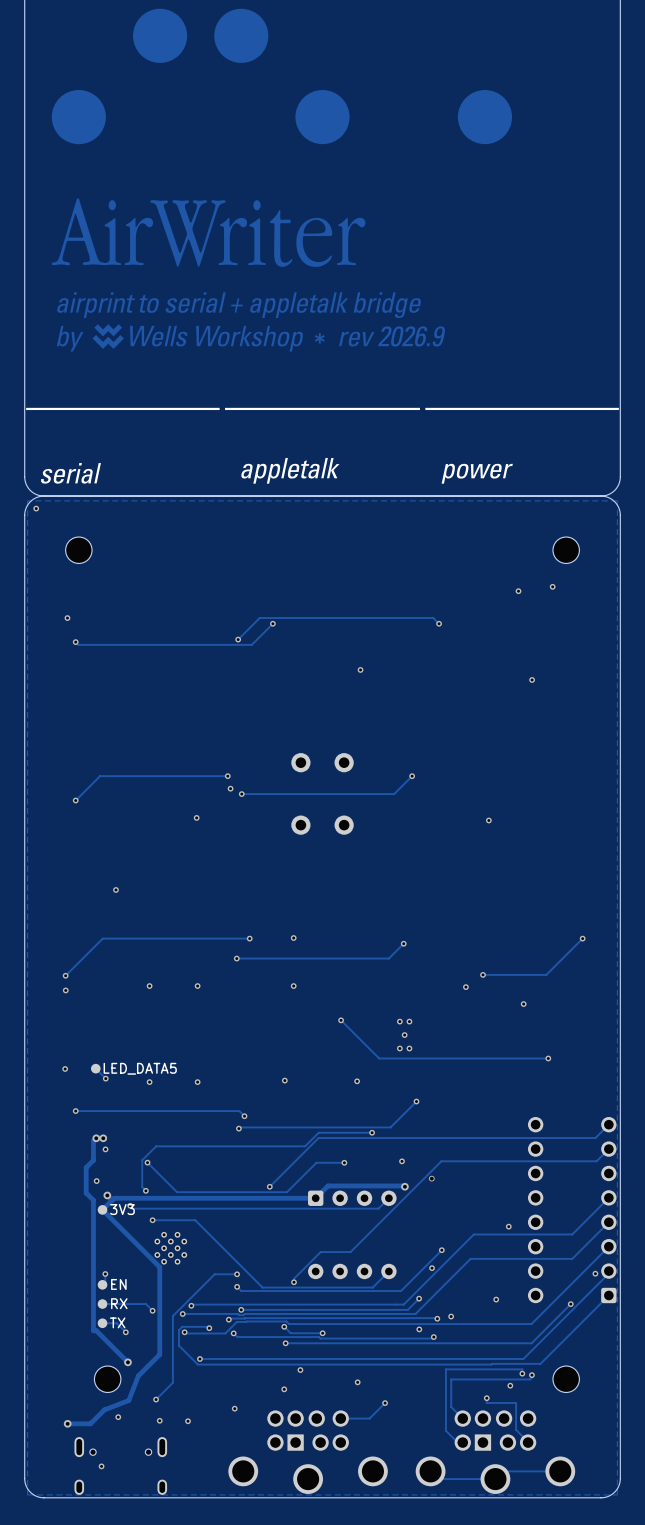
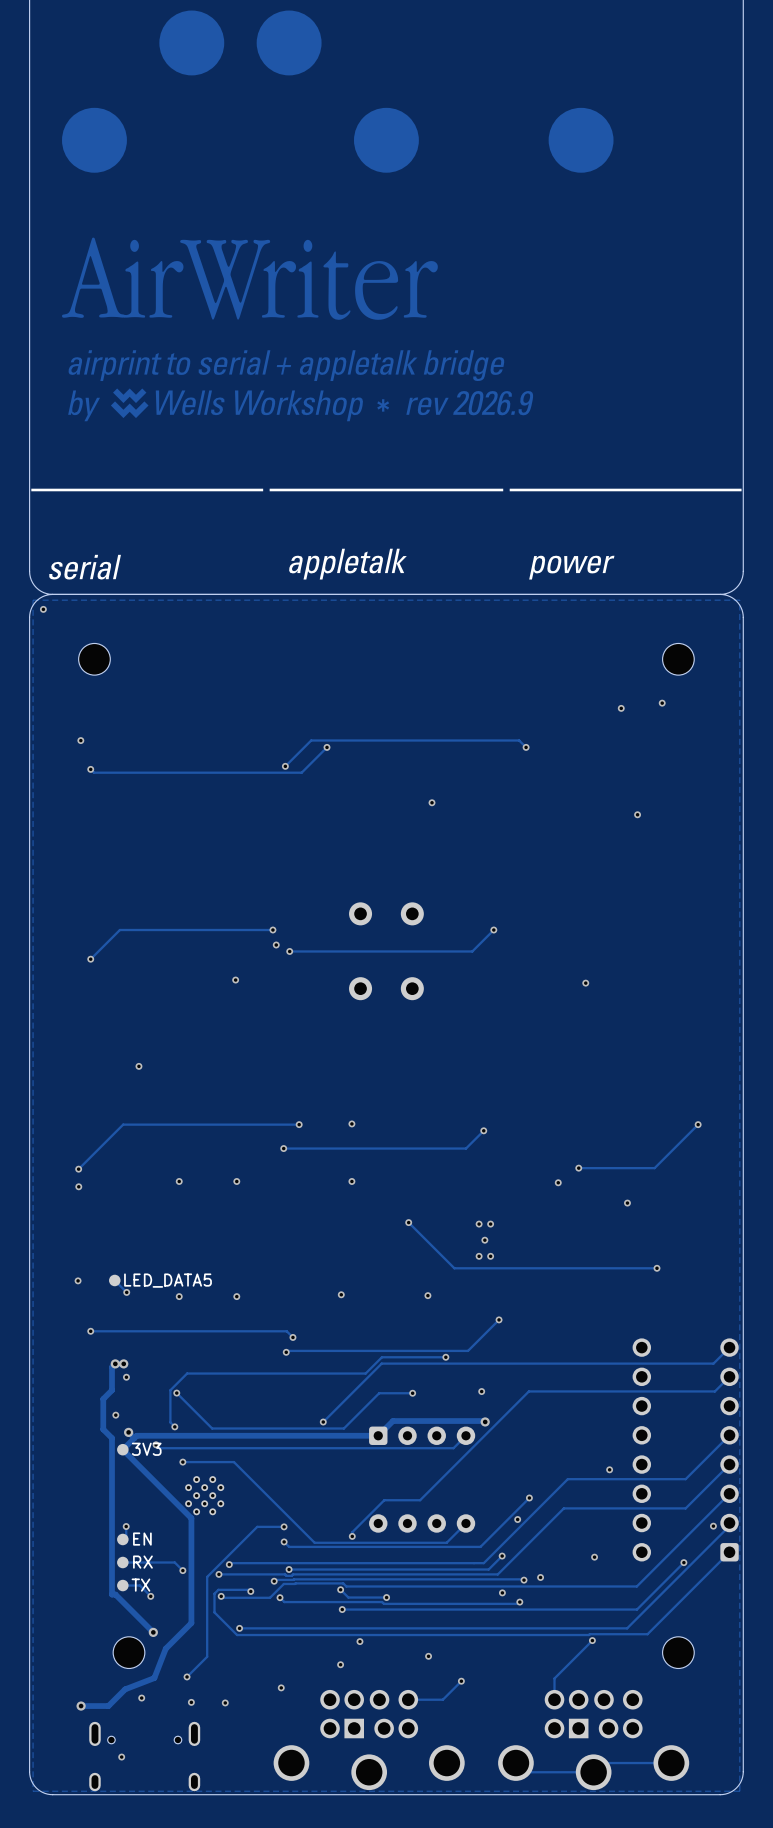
via: (431, 1178) -> none
via: none -> (592, 1640)
track: (522, 1373) (522, 1369) (445, 1369) (445, 1430) (457, 1442) (462, 1442) -> none
via: (522, 1373) -> none
track: (531, 1375) (530, 1379) (451, 1379) (451, 1407) (462, 1418) -> (592, 1640) (554, 1678) (554, 1699)
via: (531, 1375) -> none
via: (510, 1385) -> none
track: (486, 1398) (486, 1402) (516, 1402) (516, 1429) (528, 1442) -> none
via: (486, 1398) -> none

